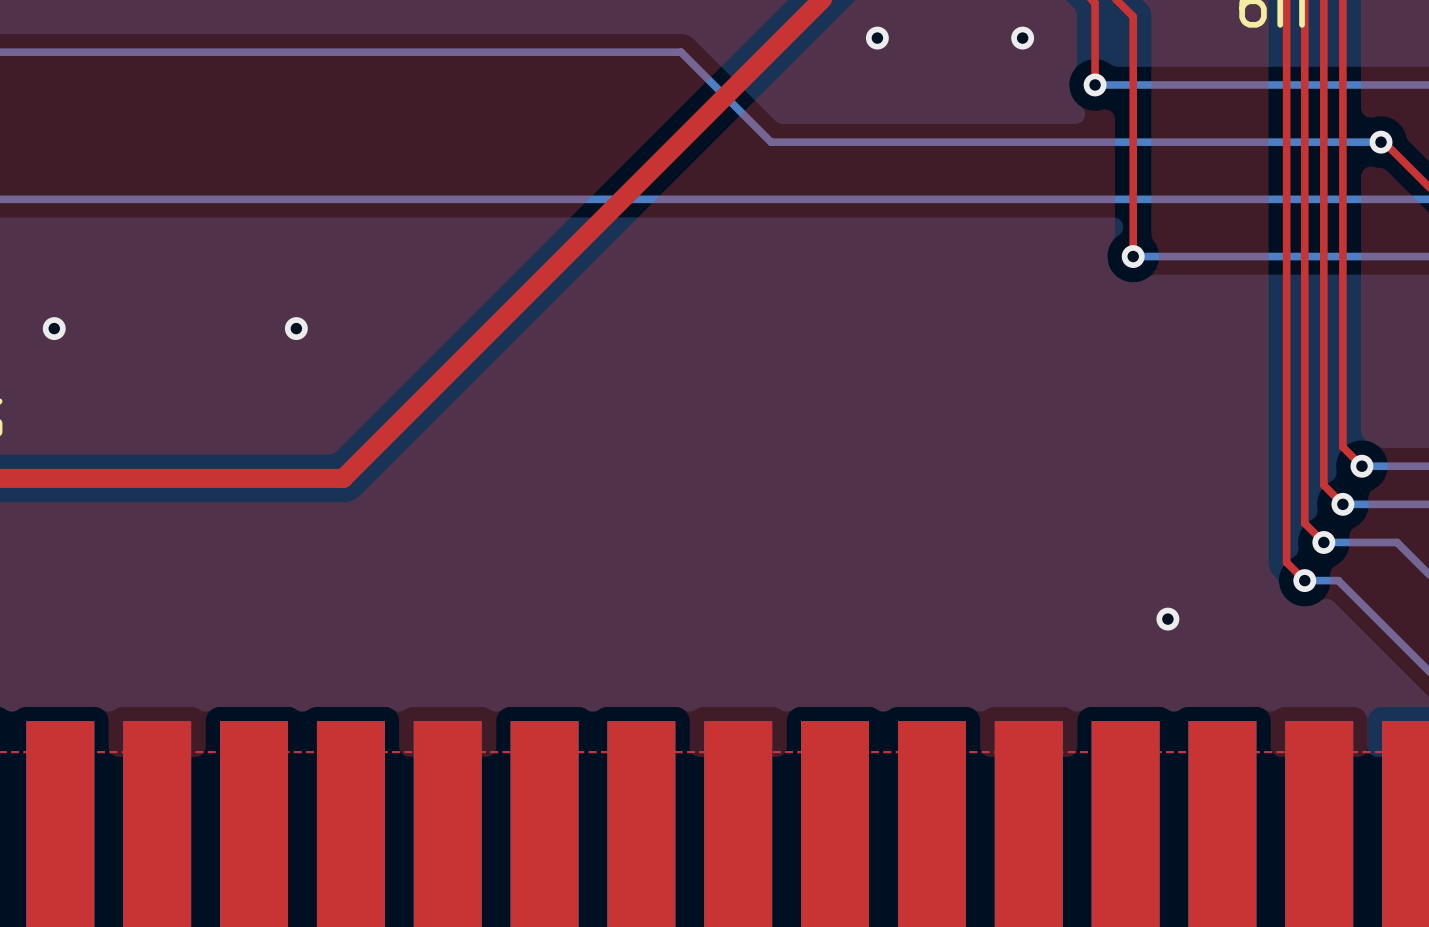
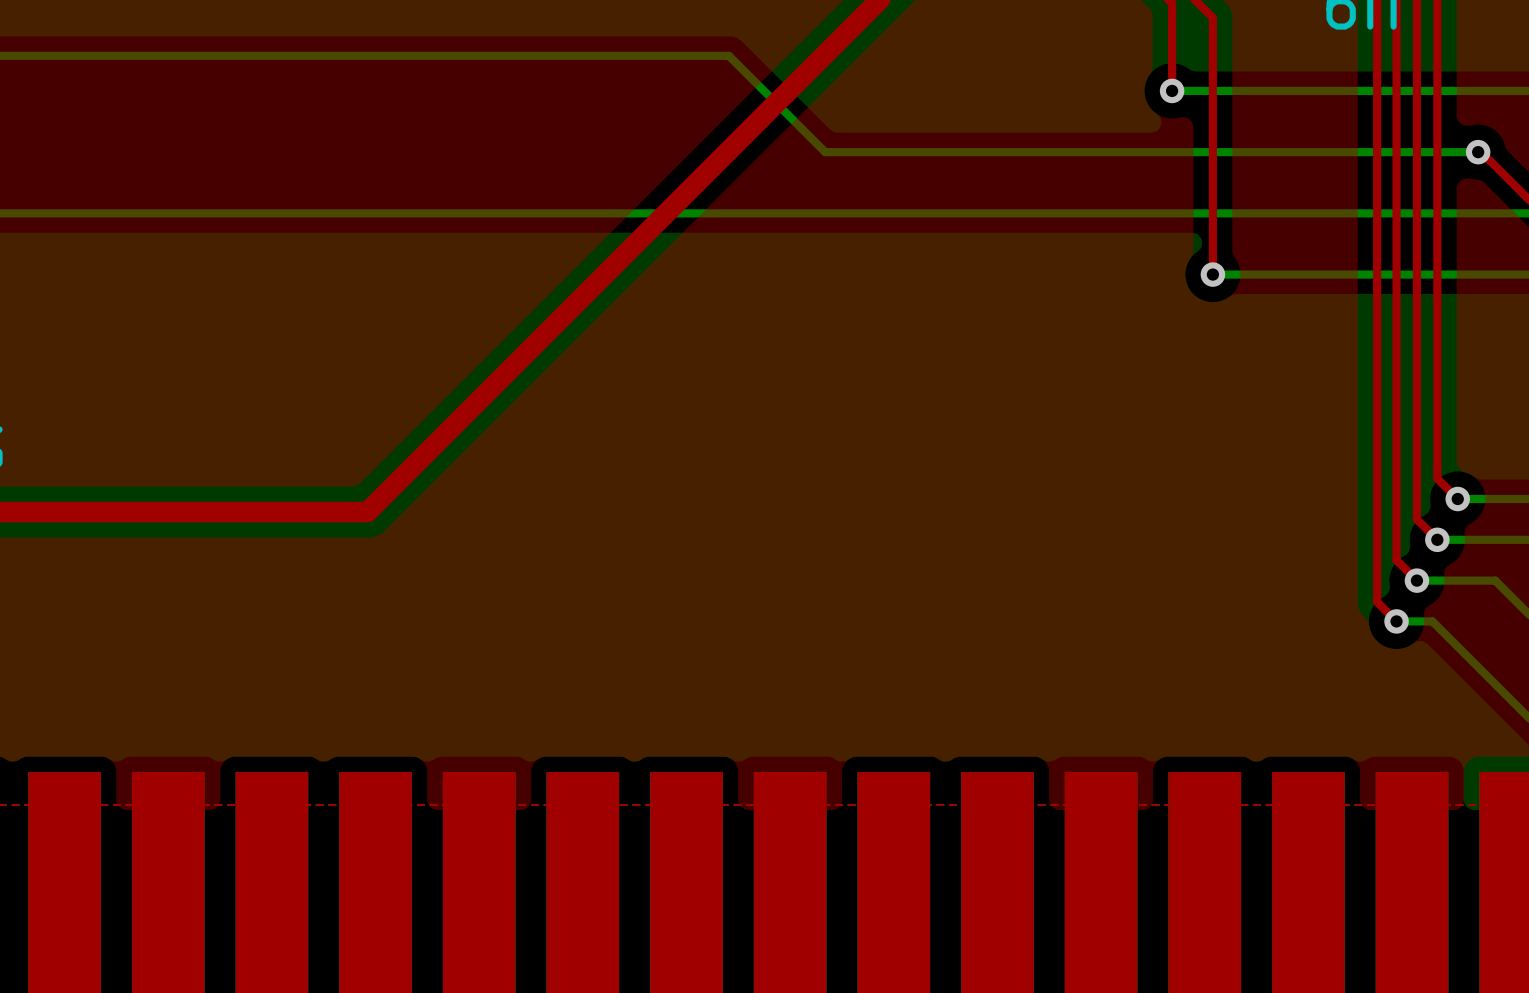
via: (877, 38) -> none
via: (1022, 38) -> none
via: (54, 328) -> none
via: (296, 328) -> none
via: (1167, 619) -> none

